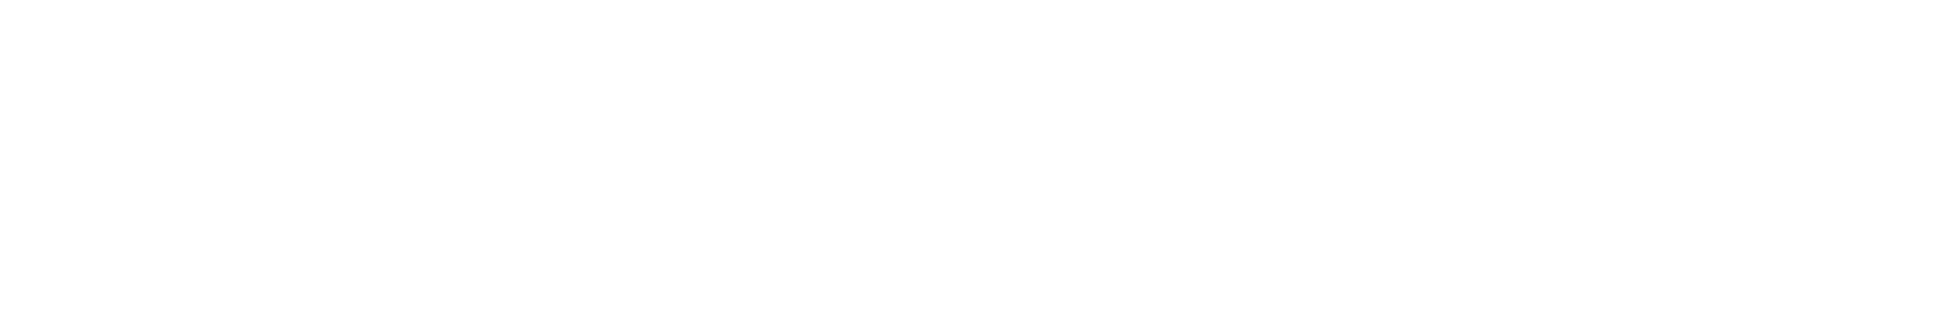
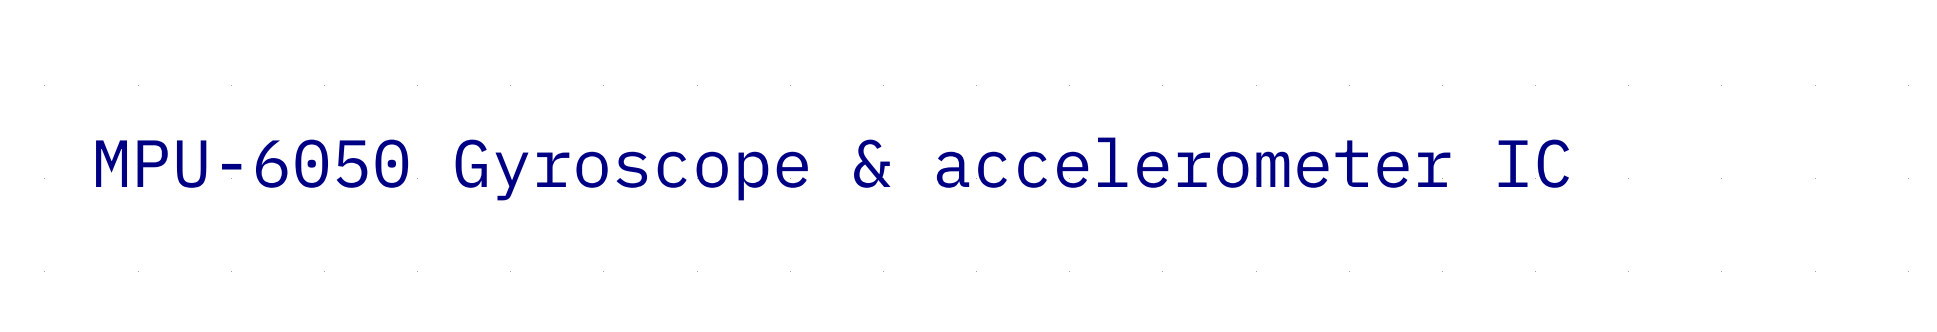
text: none -> MPU-6050 Gyroscope & accelerometer IC (832, 168)

